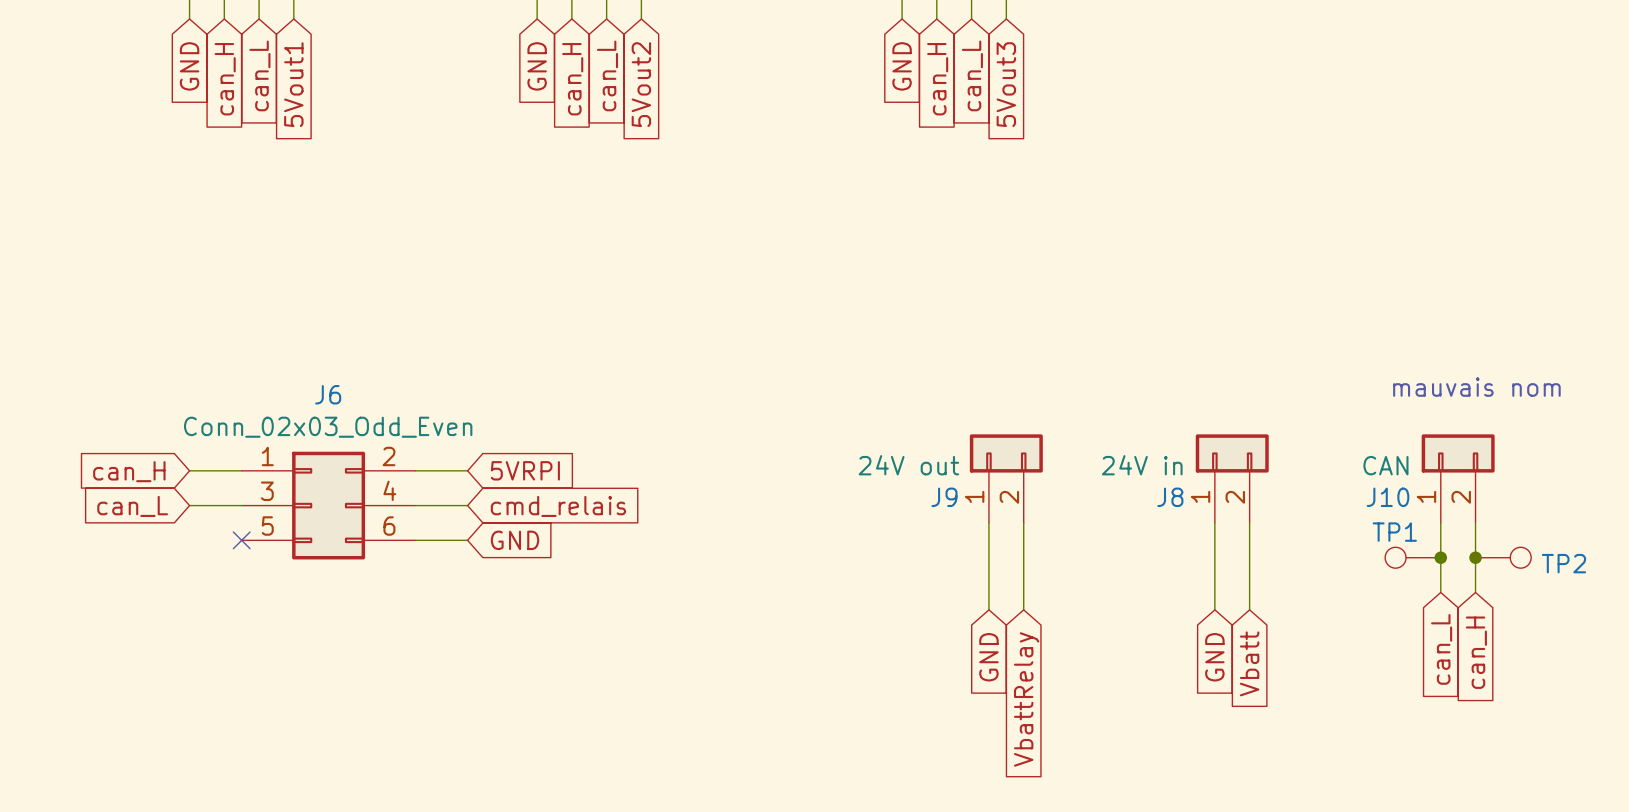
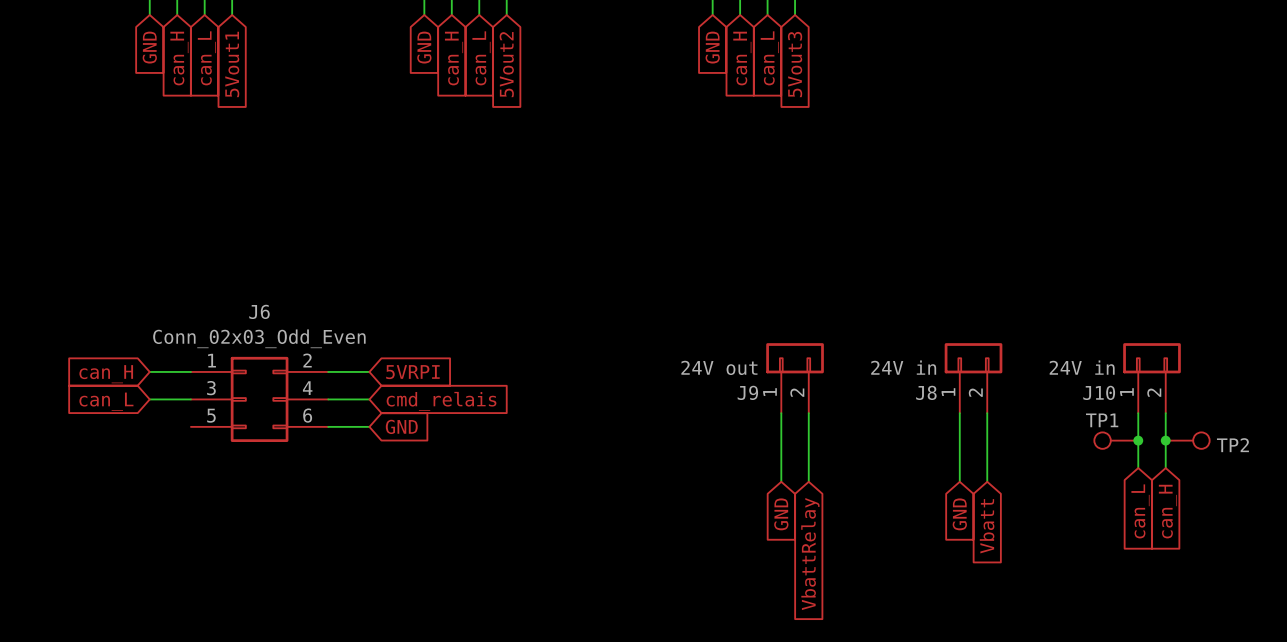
text: mauvais nom (1476, 387) -> none
J10 value: CAN (1385, 465) -> 24V in (1082, 367)
no-connect mark: (241, 540) -> none

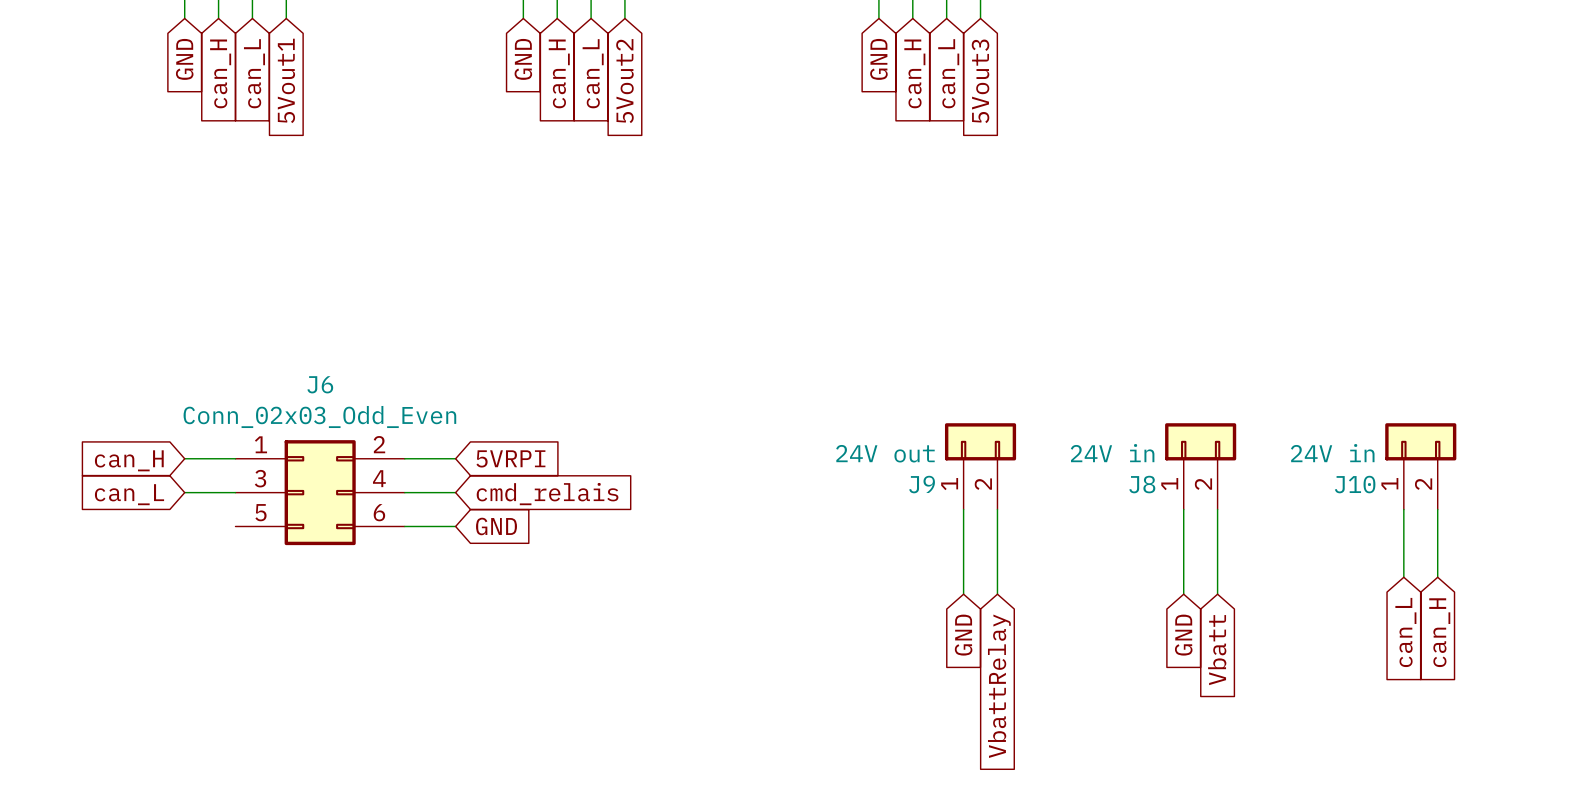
TP1: (1116, 440) -> none
junction: (1138, 440) -> none
junction: (1165, 440) -> none
TP2: (1187, 440) -> none

